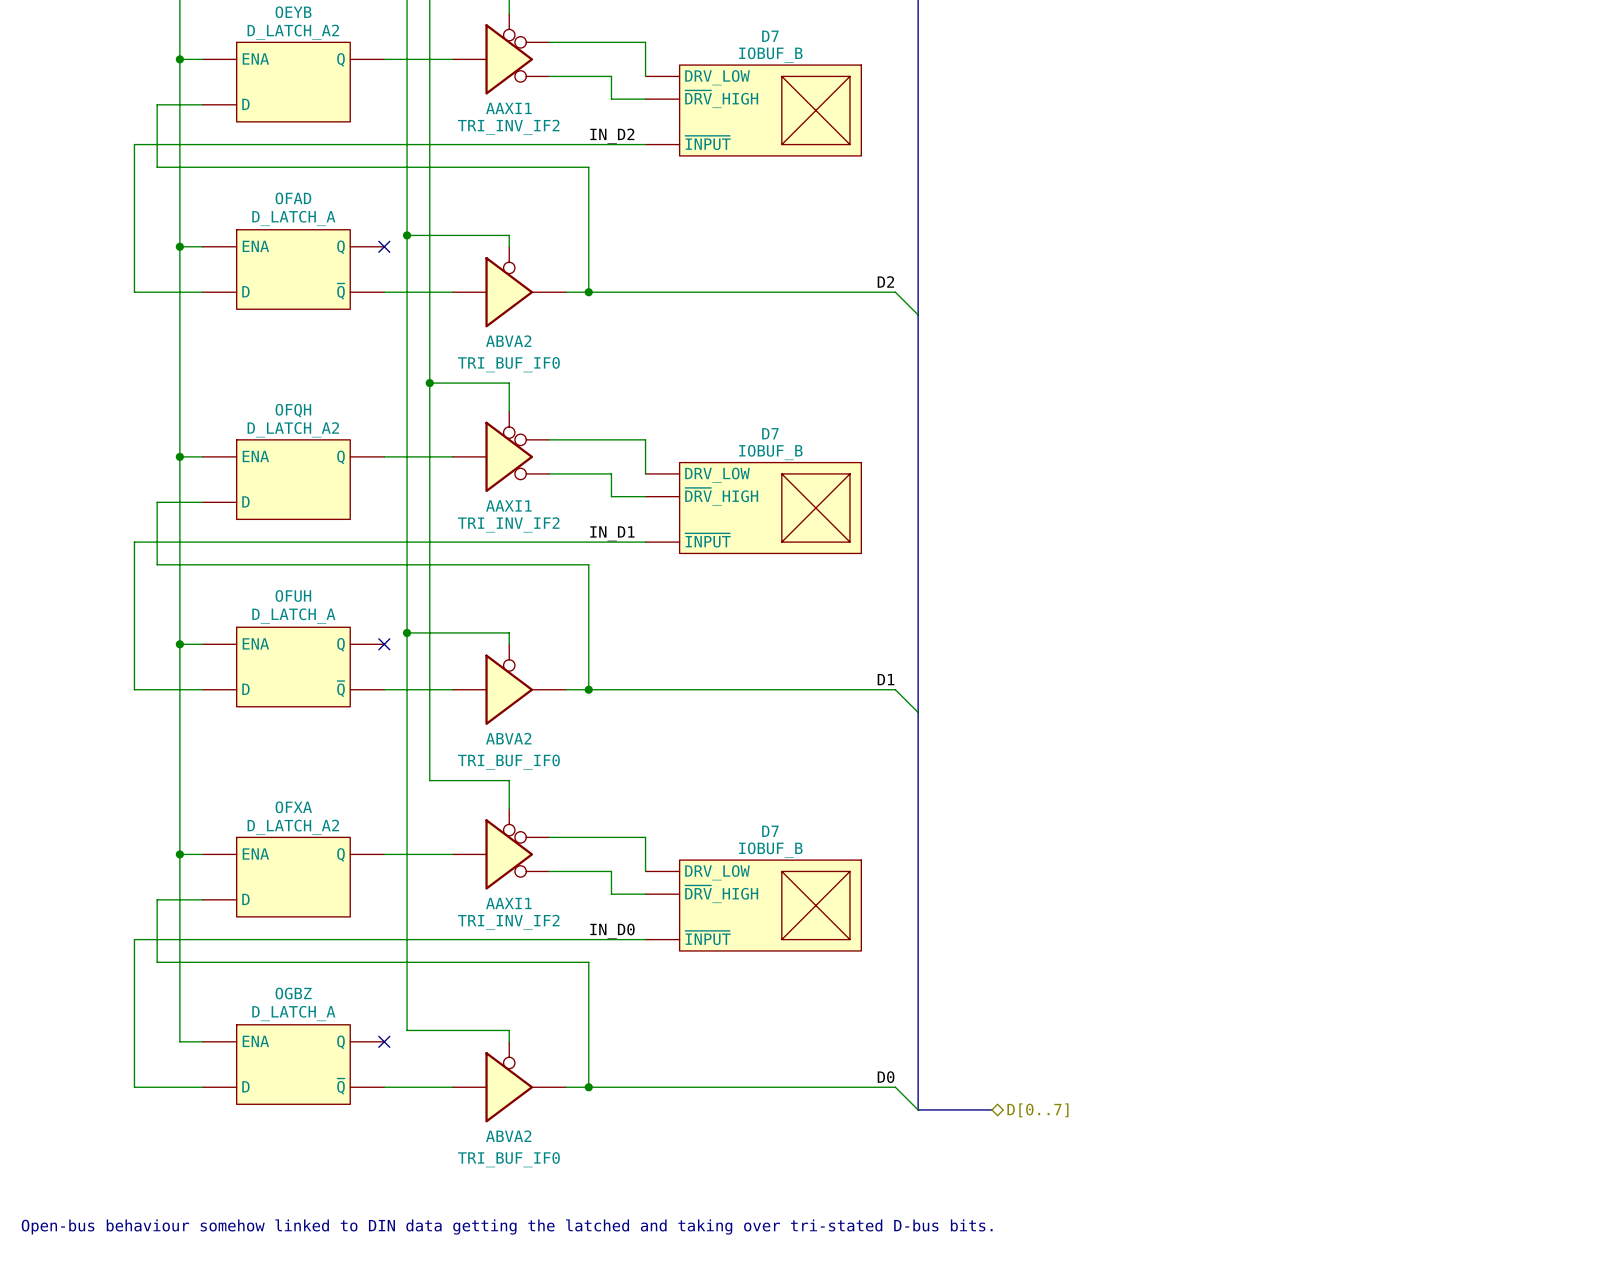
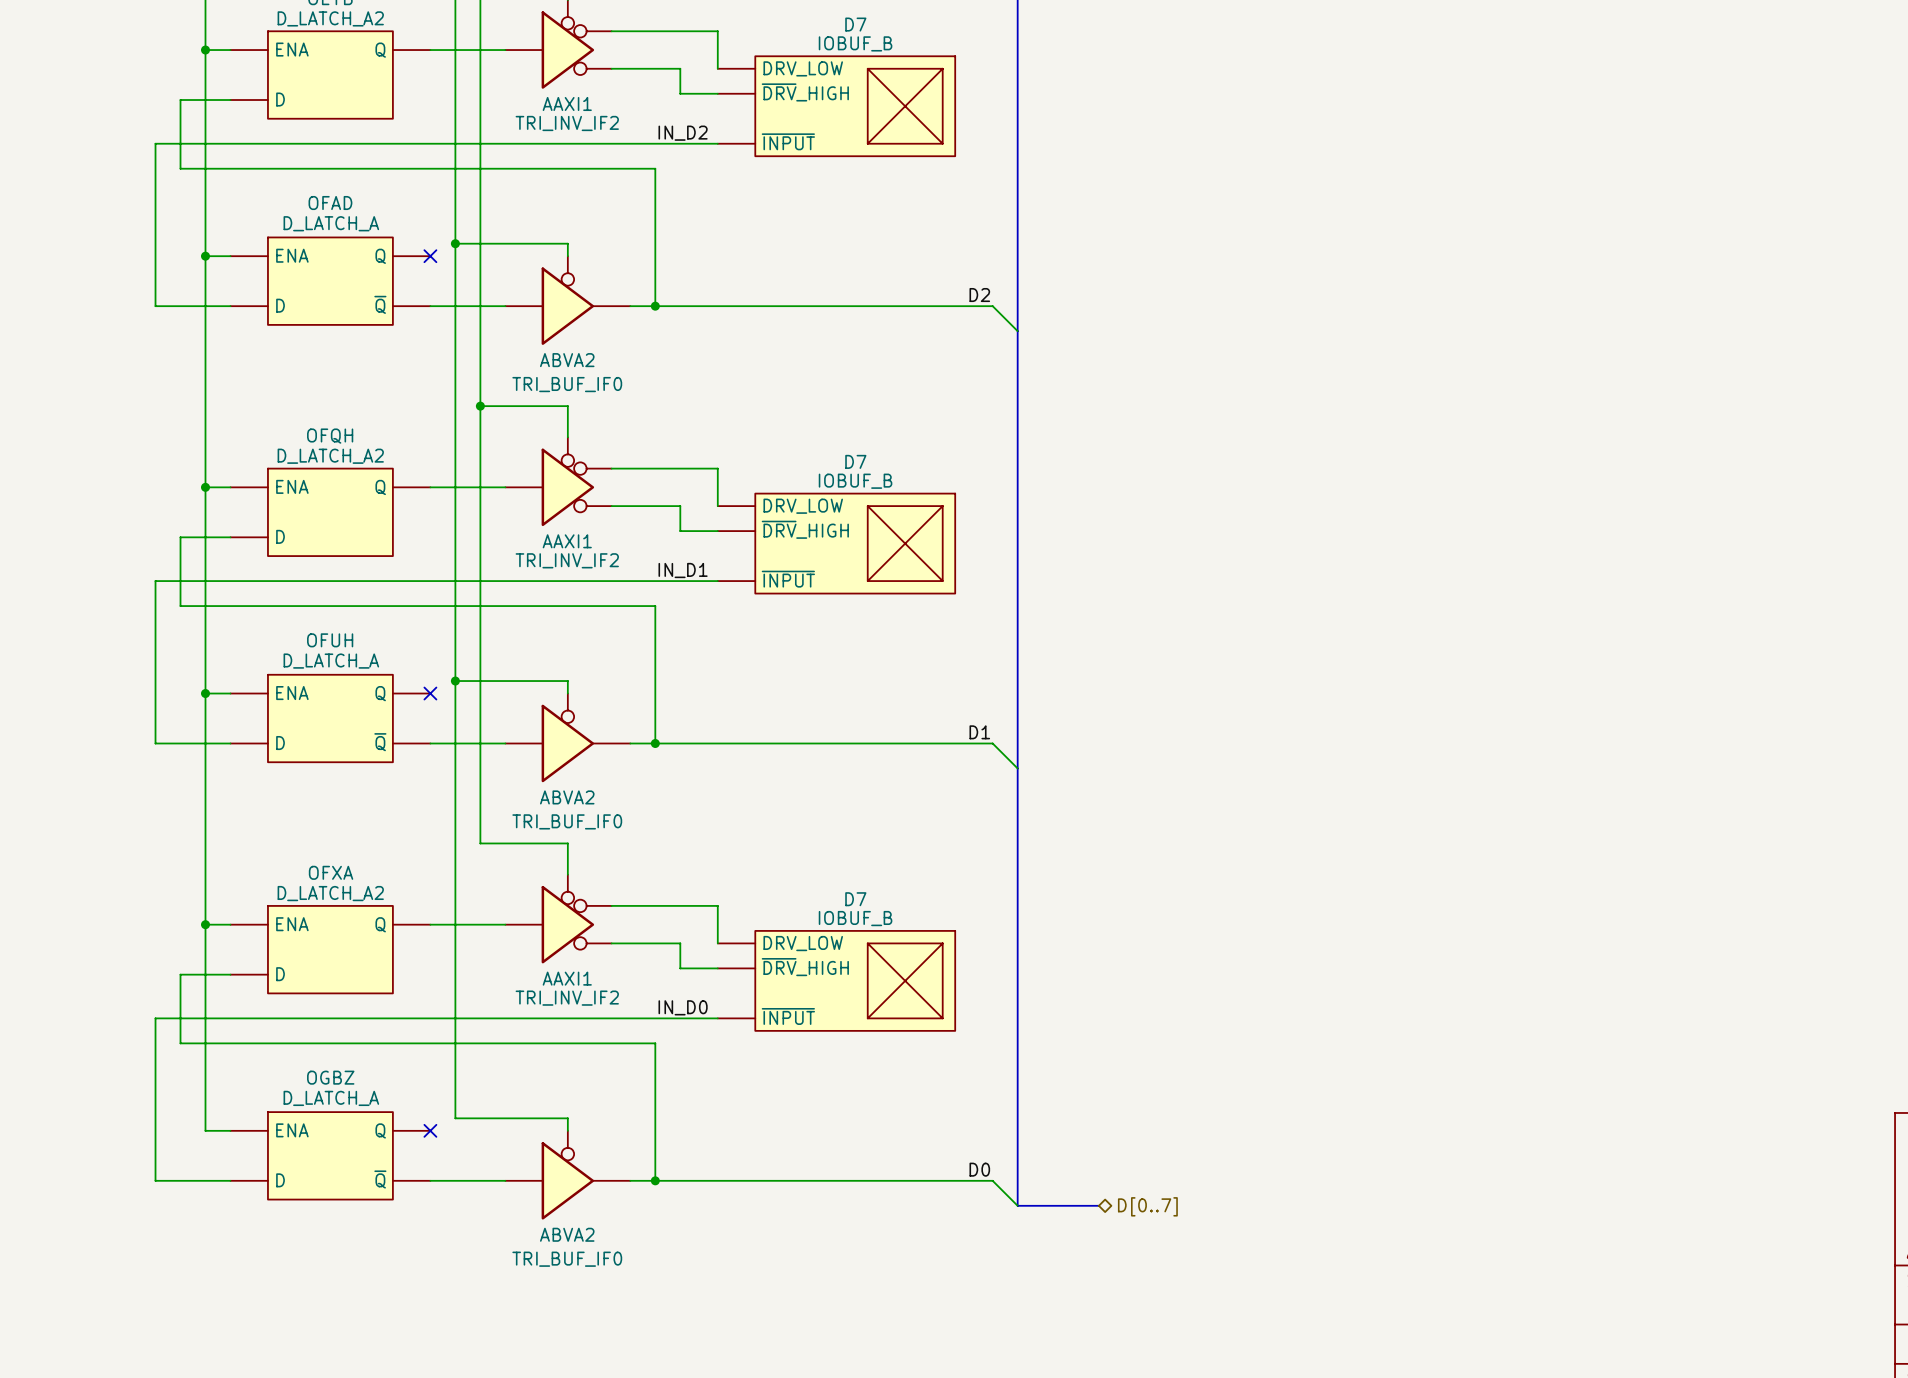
text: Open-bus behaviour somehow linked to DIN data getting the latched and taking over tri-stated D-bus bits. (507, 1226) -> none

